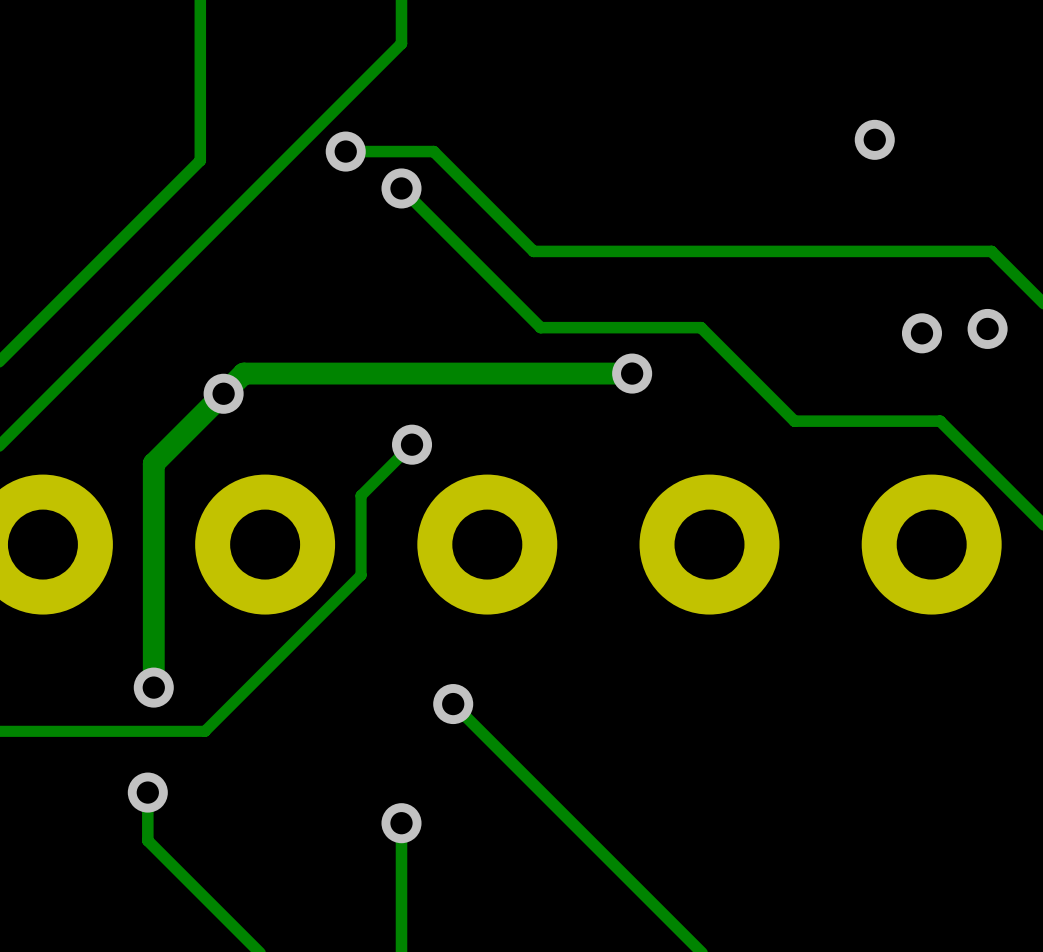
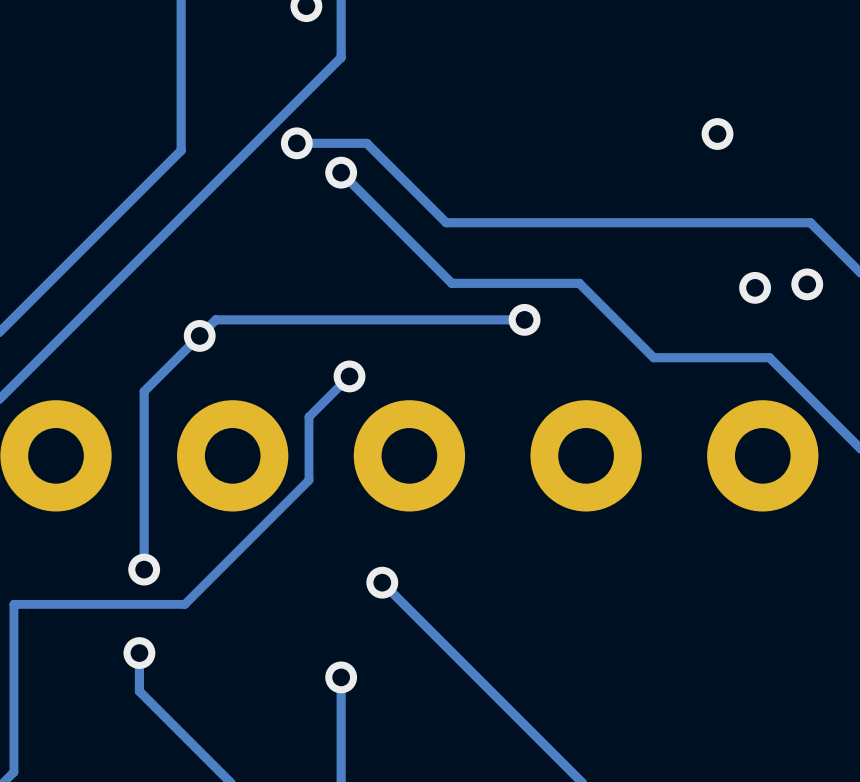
track width: thick (632, 373) (243, 373) (226, 390) -> thin (524, 319) (215, 319) (202, 333)
track width: thick (223, 393) (153, 463) (153, 687) -> thin (199, 335) (144, 391) (144, 569)

